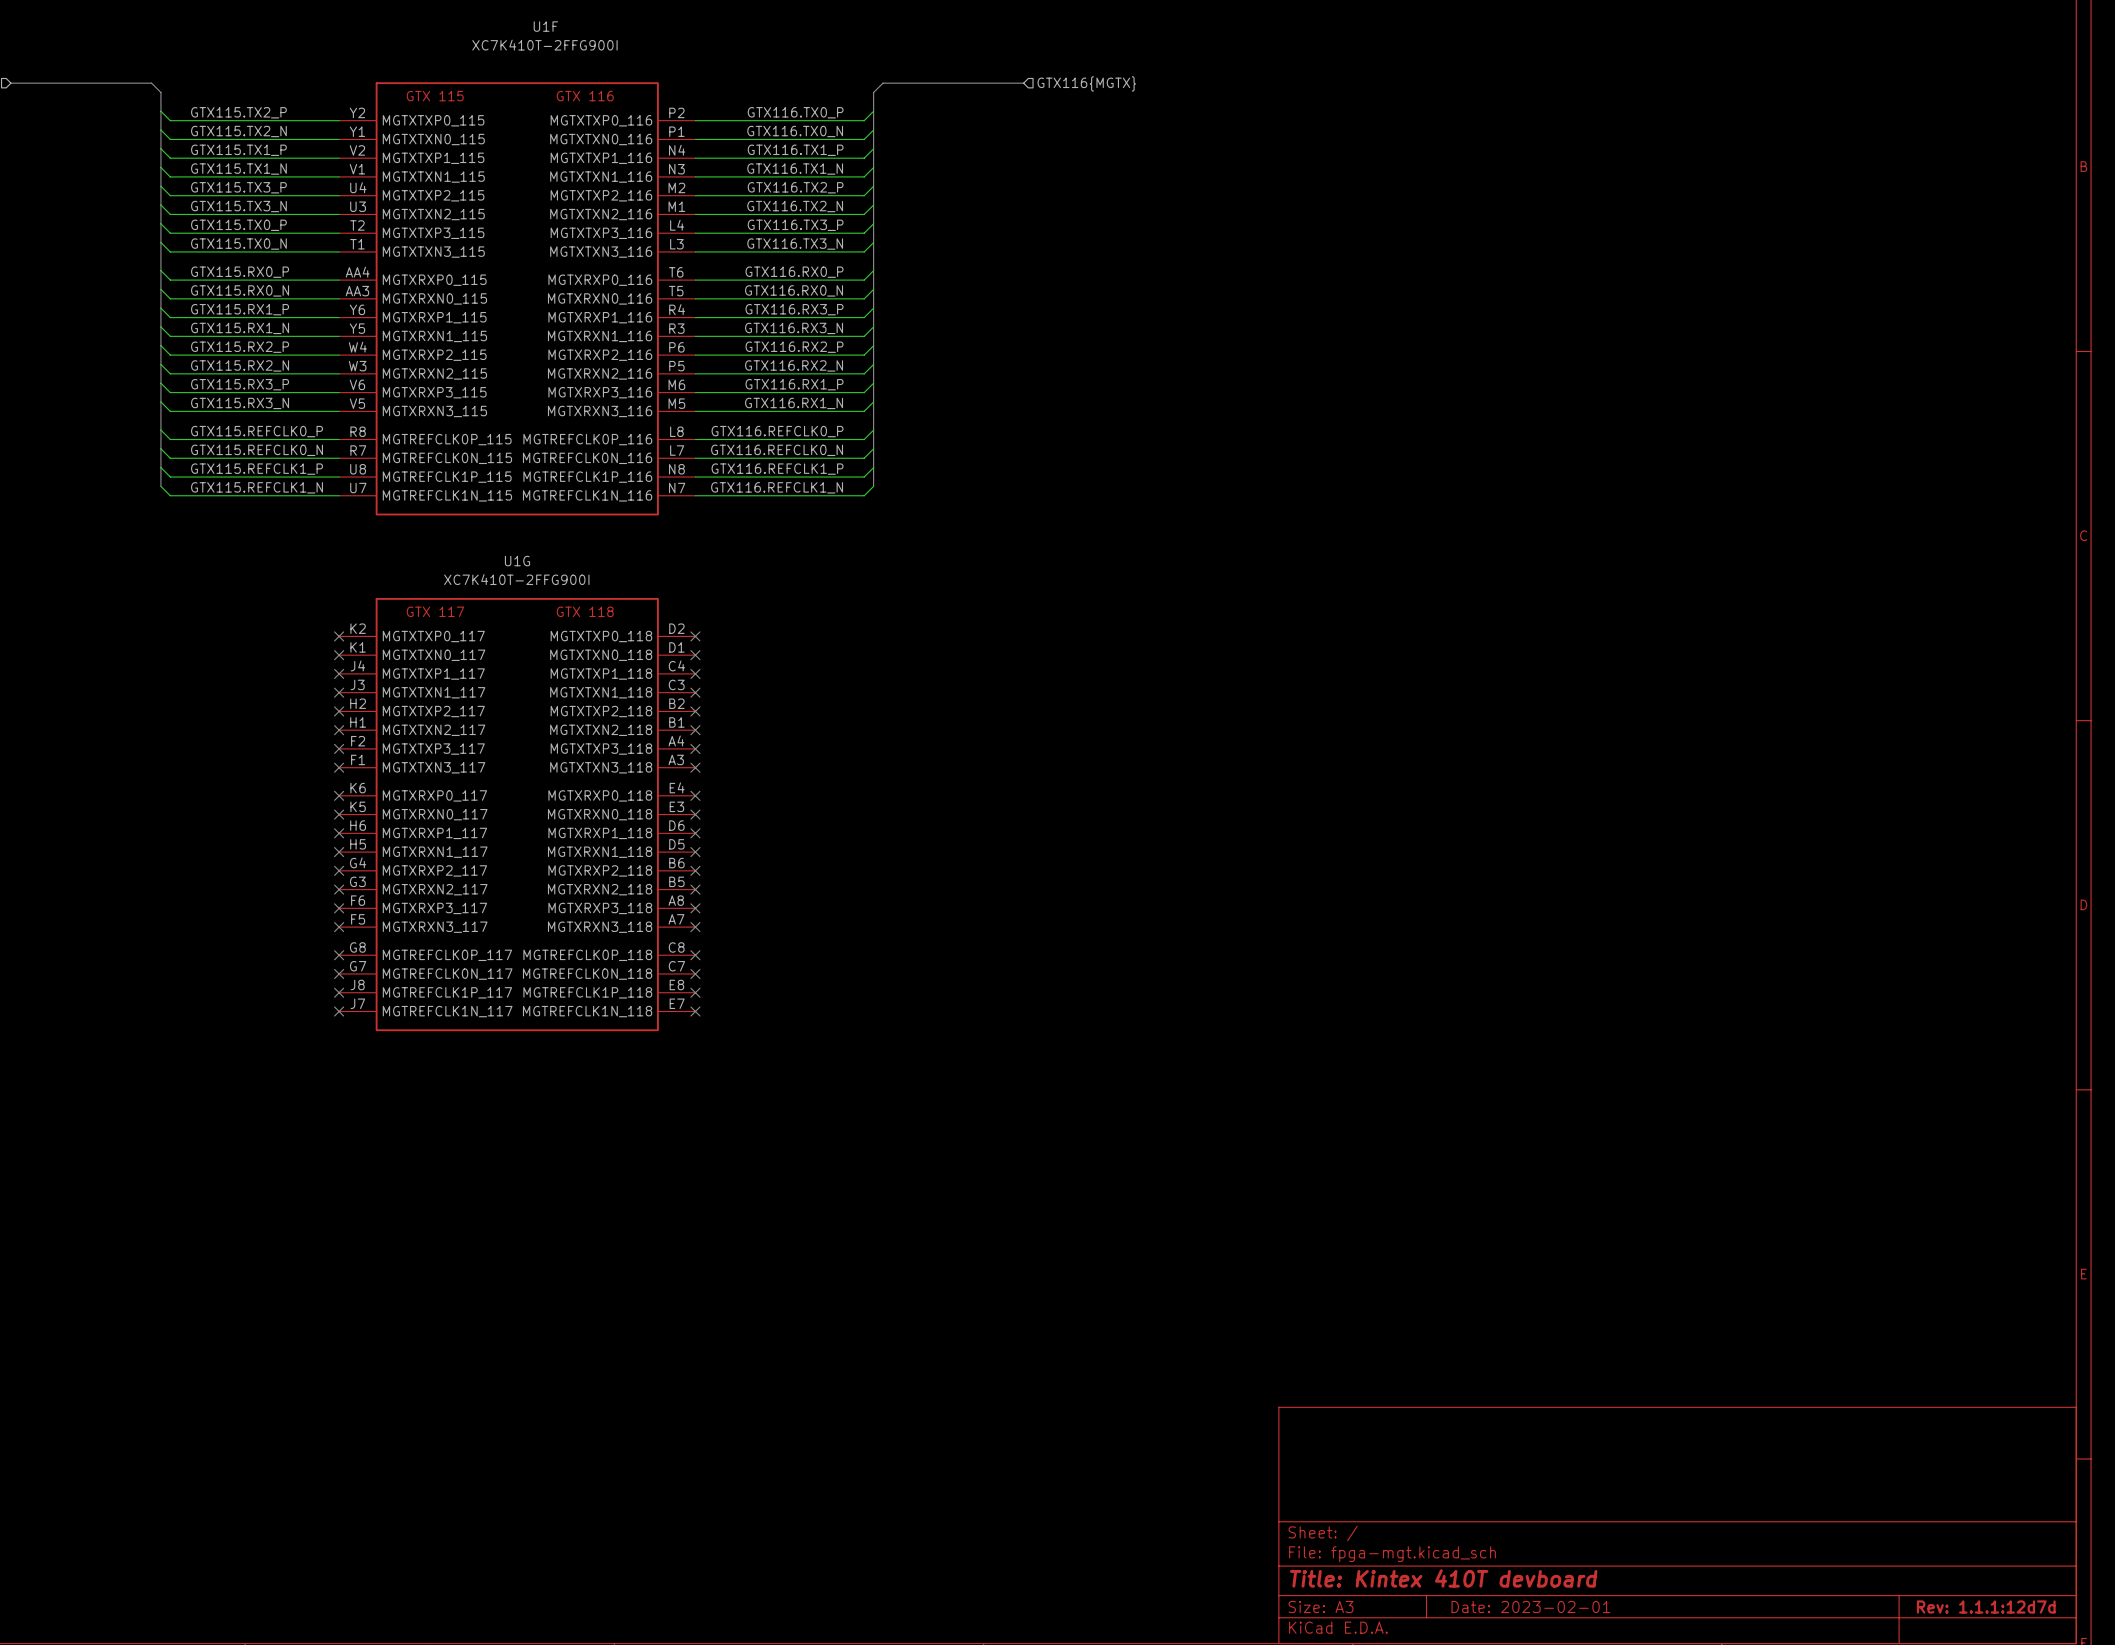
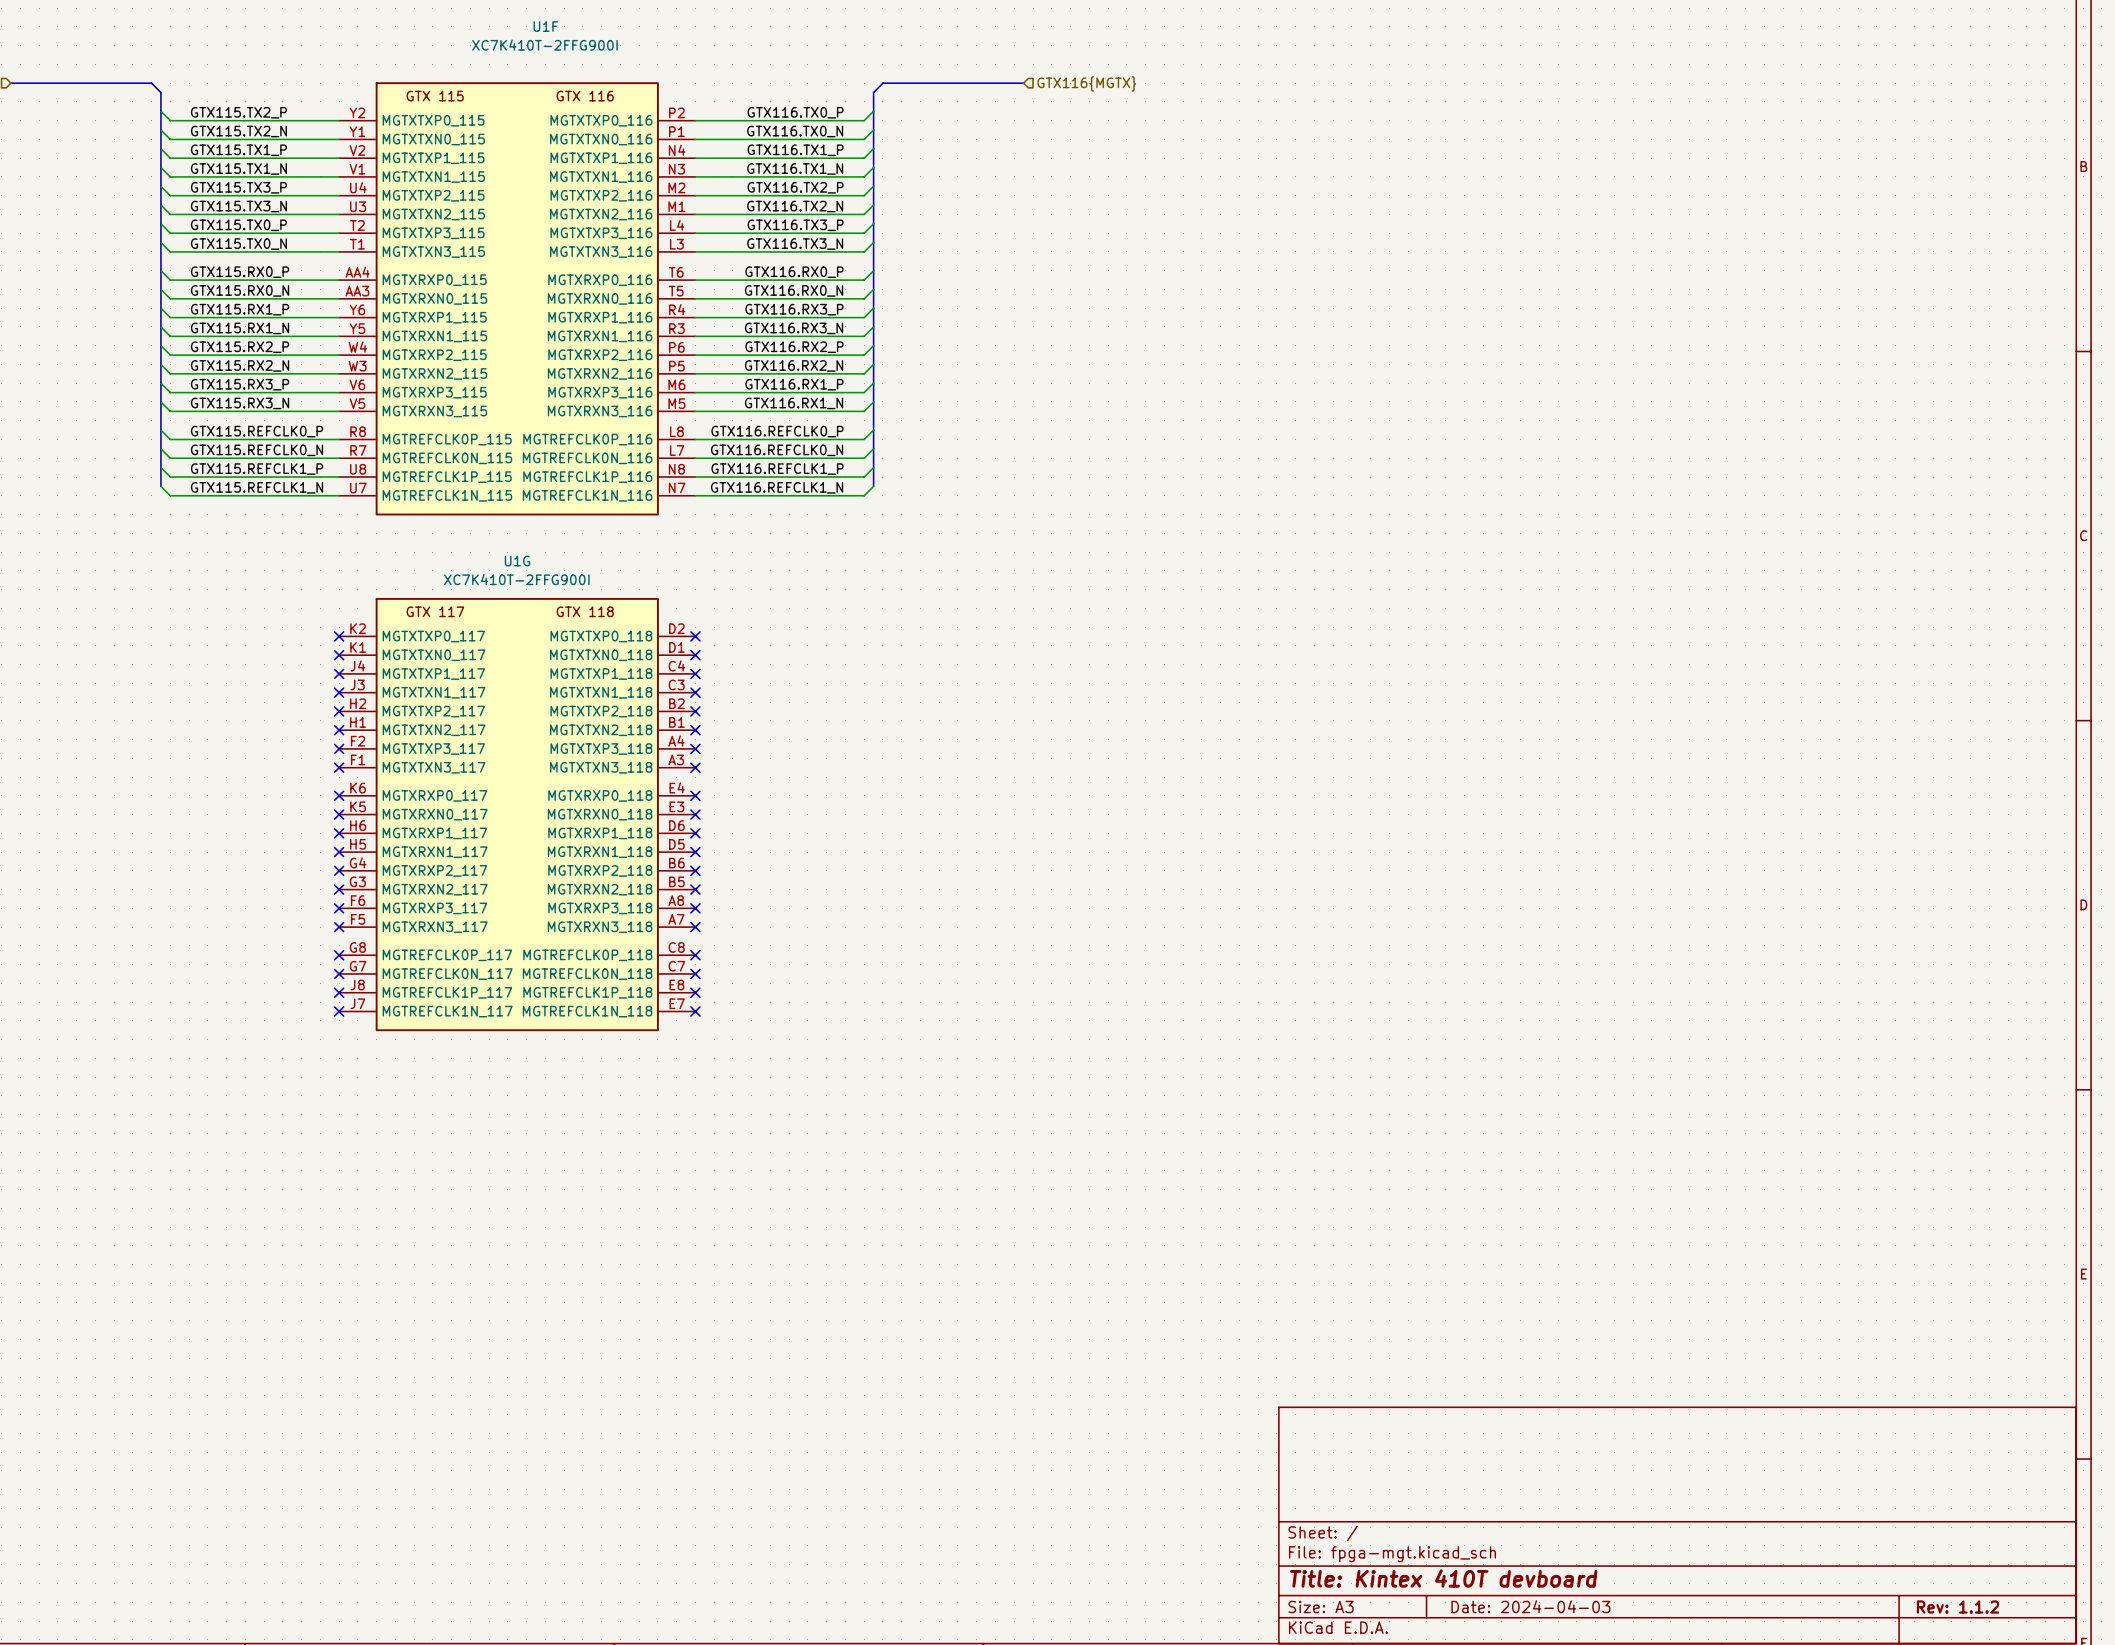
title block: Date: 2023-02-01 (1530, 1607) -> Date: 2024-04-03 (1530, 1606)
title block: Rev: 1.1.1:12d7d (1986, 1607) -> Rev: 1.1.2 (1958, 1607)

